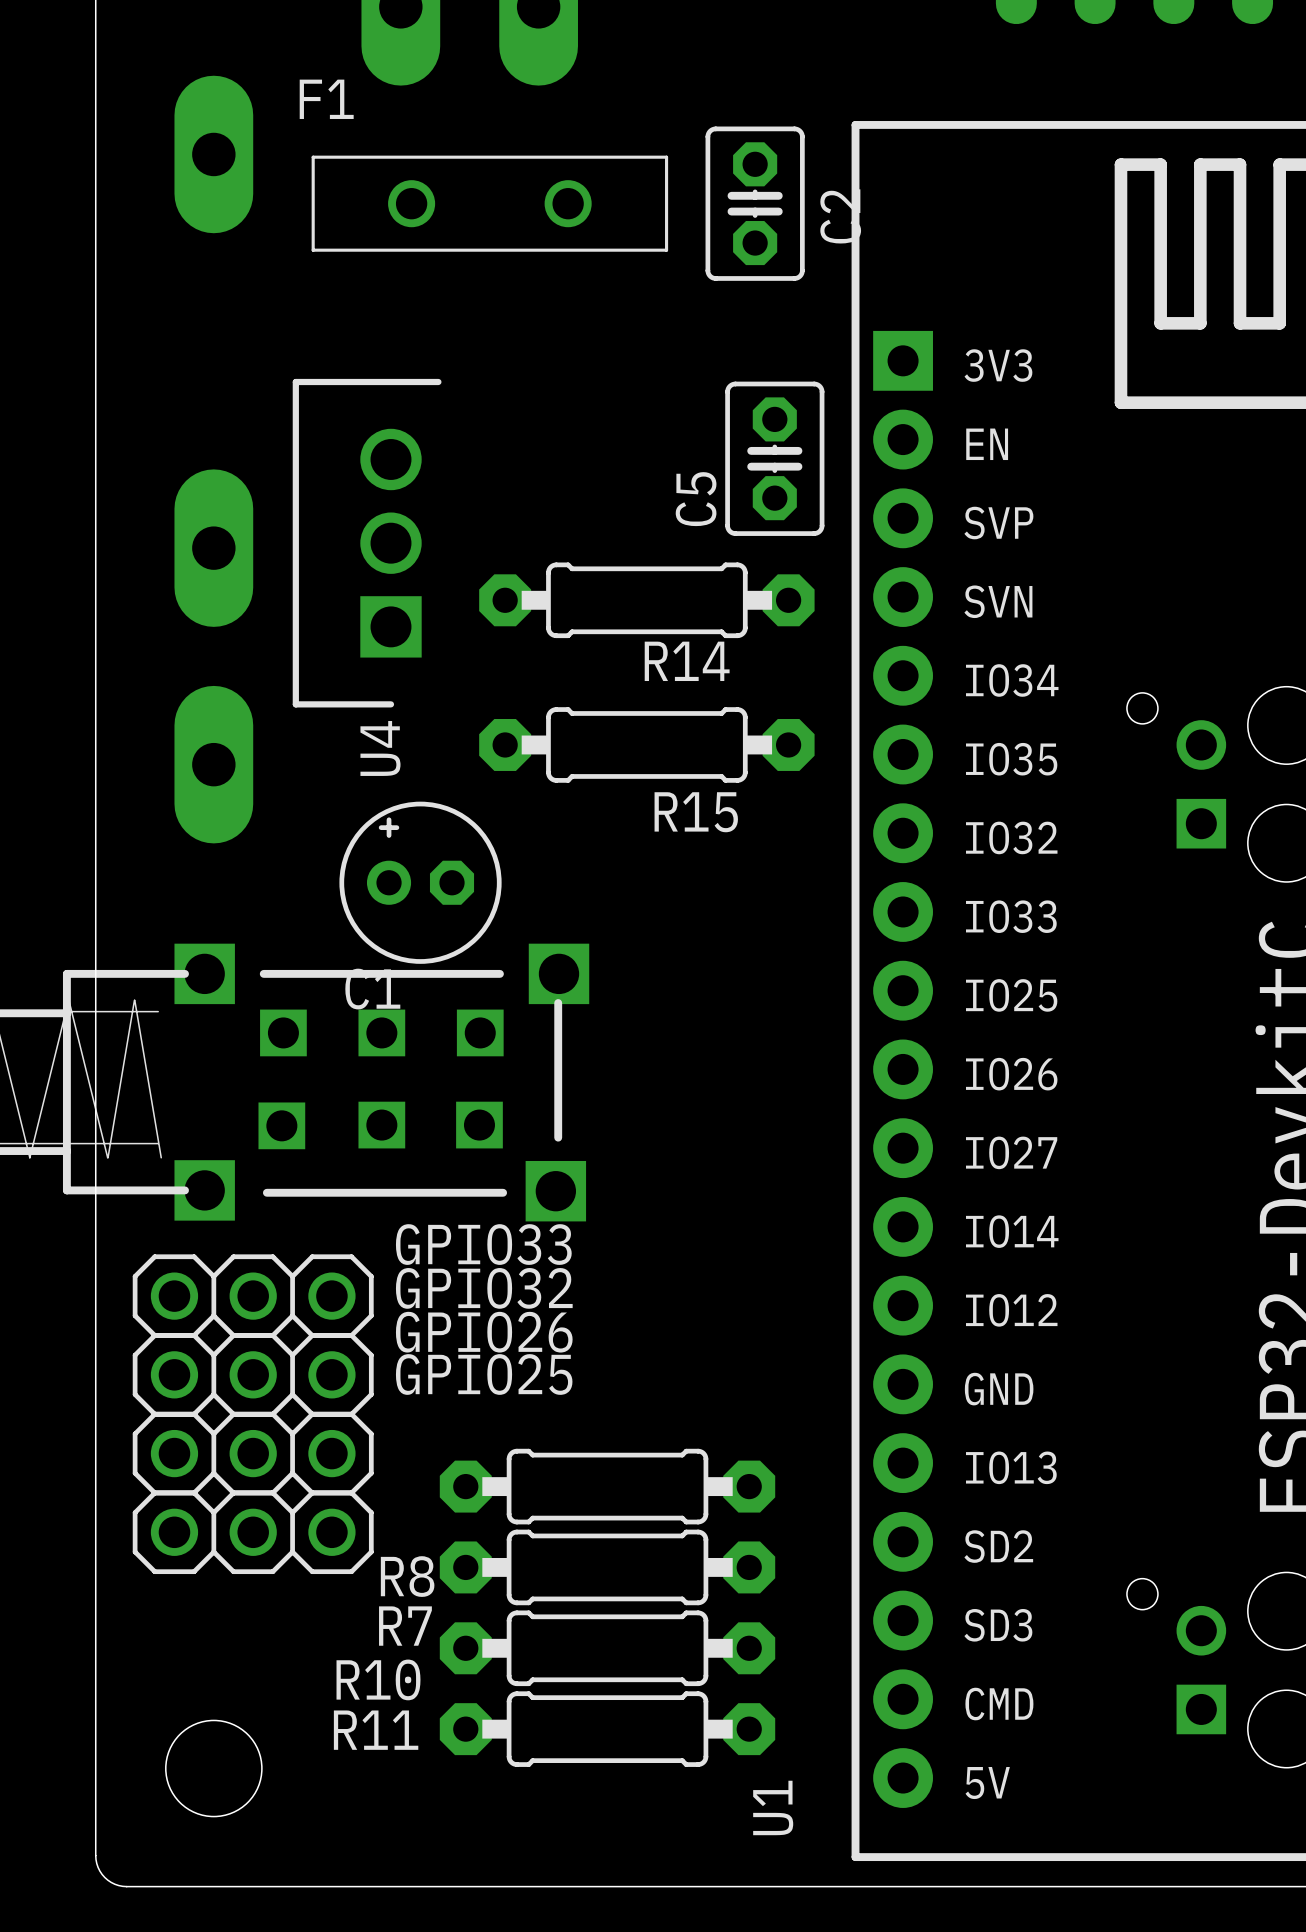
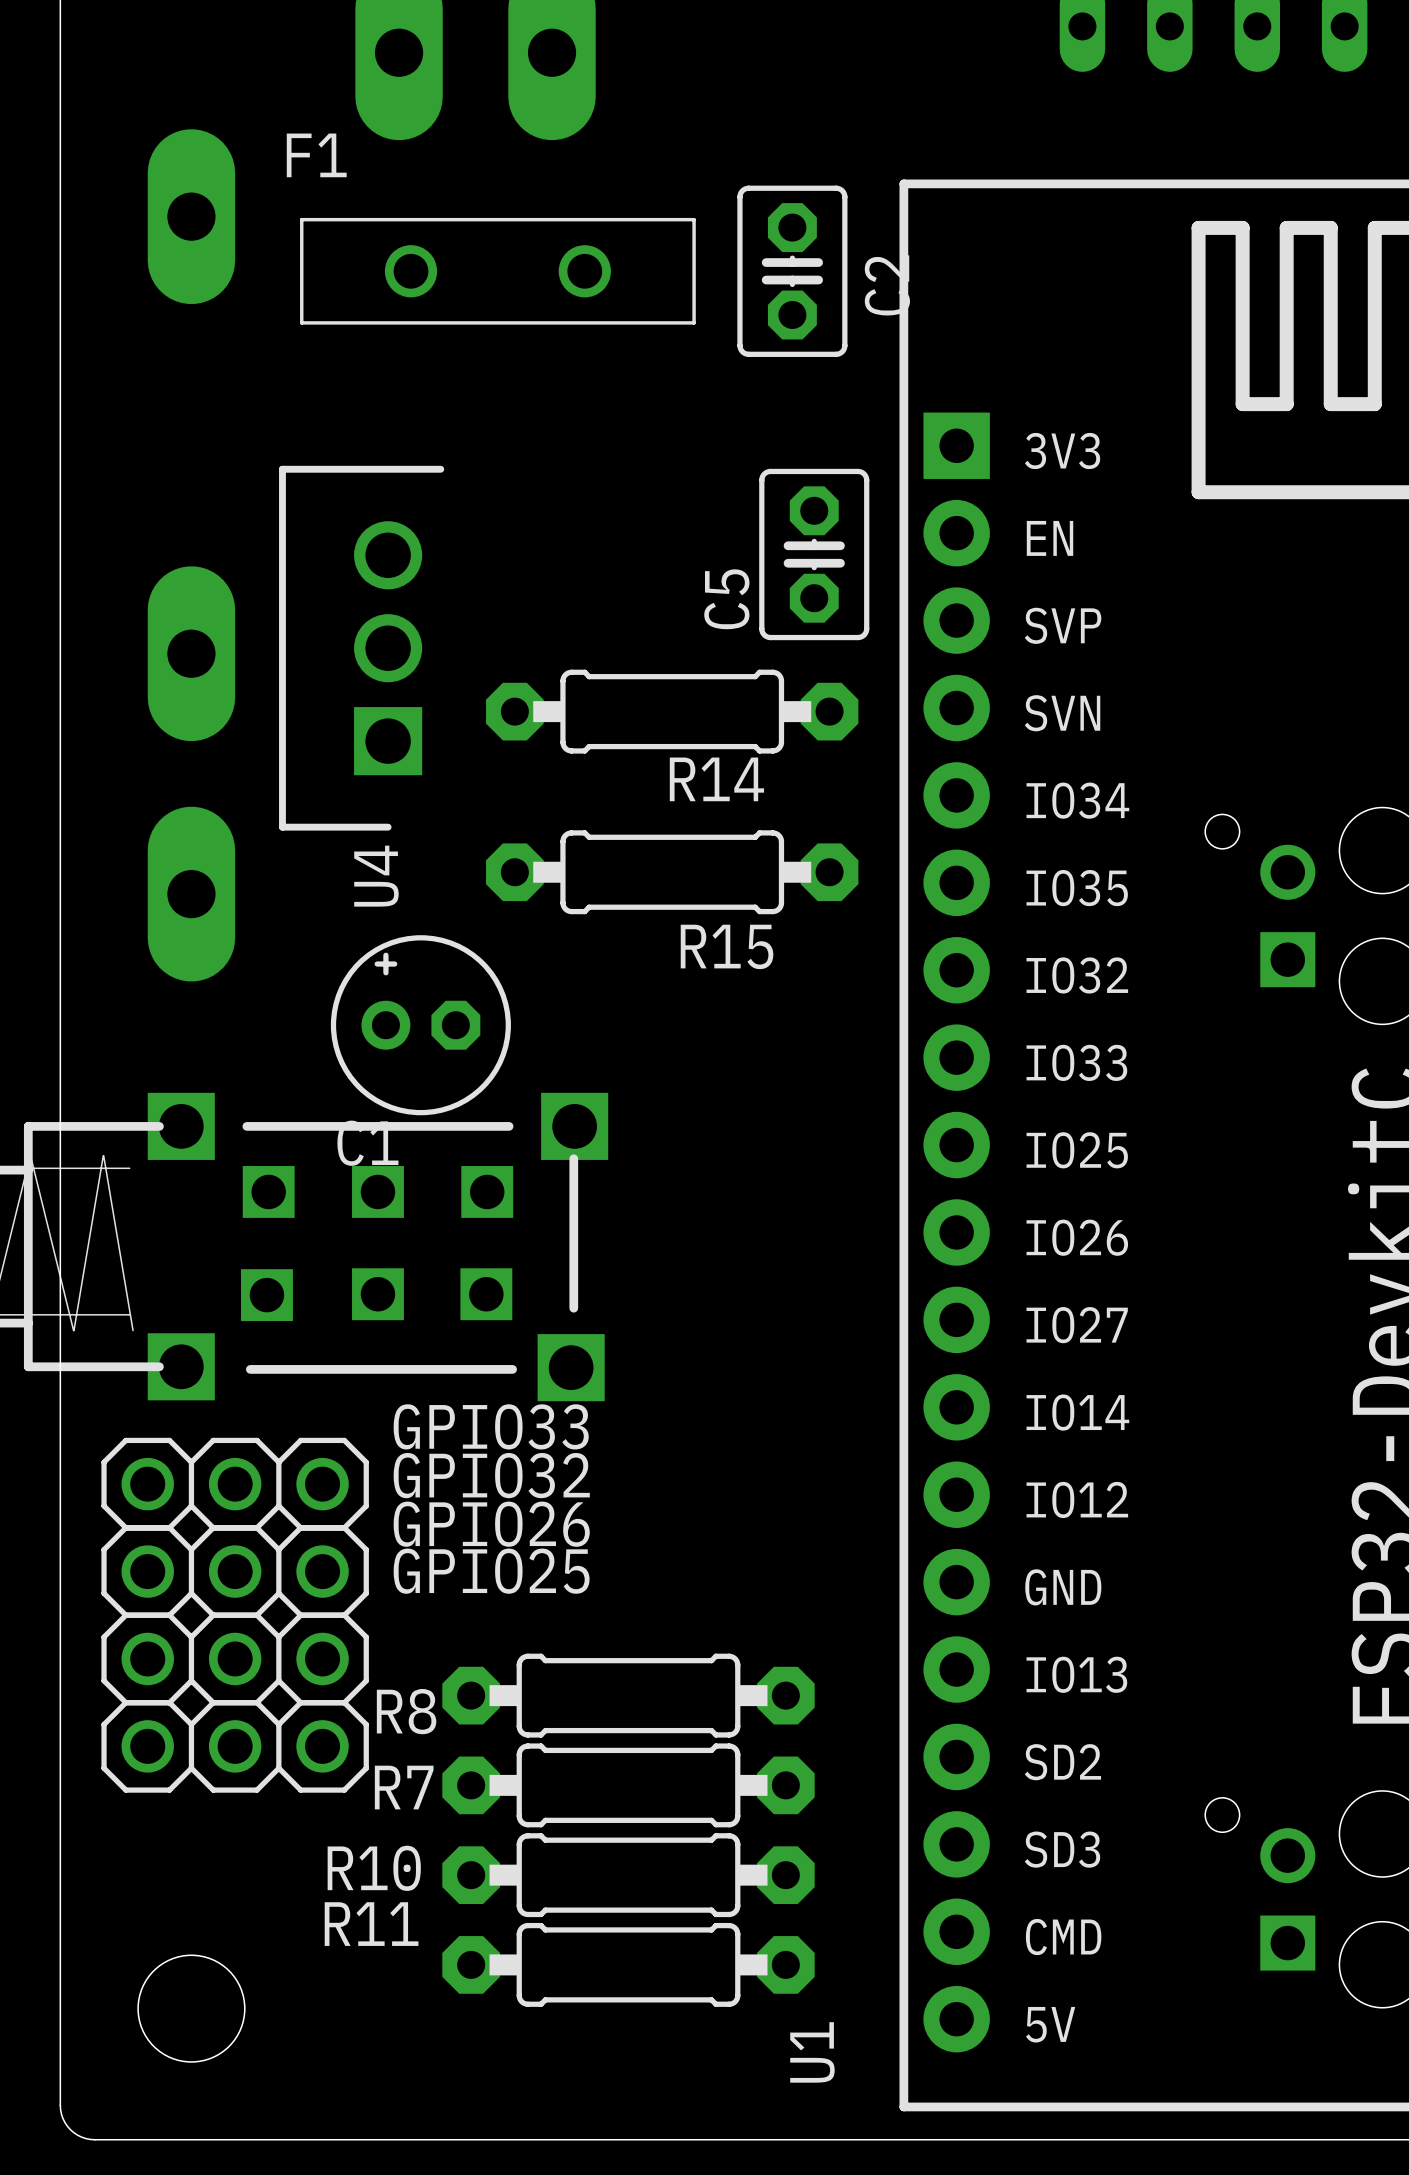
R8 name position: R8 (407, 1576) -> R8 (406, 1711)
R7 name position: R7 (405, 1626) -> R7 (404, 1787)
R10 name position: R10 (378, 1679) -> R10 (374, 1868)
R11 name position: R11 (376, 1730) -> R11 (371, 1924)

